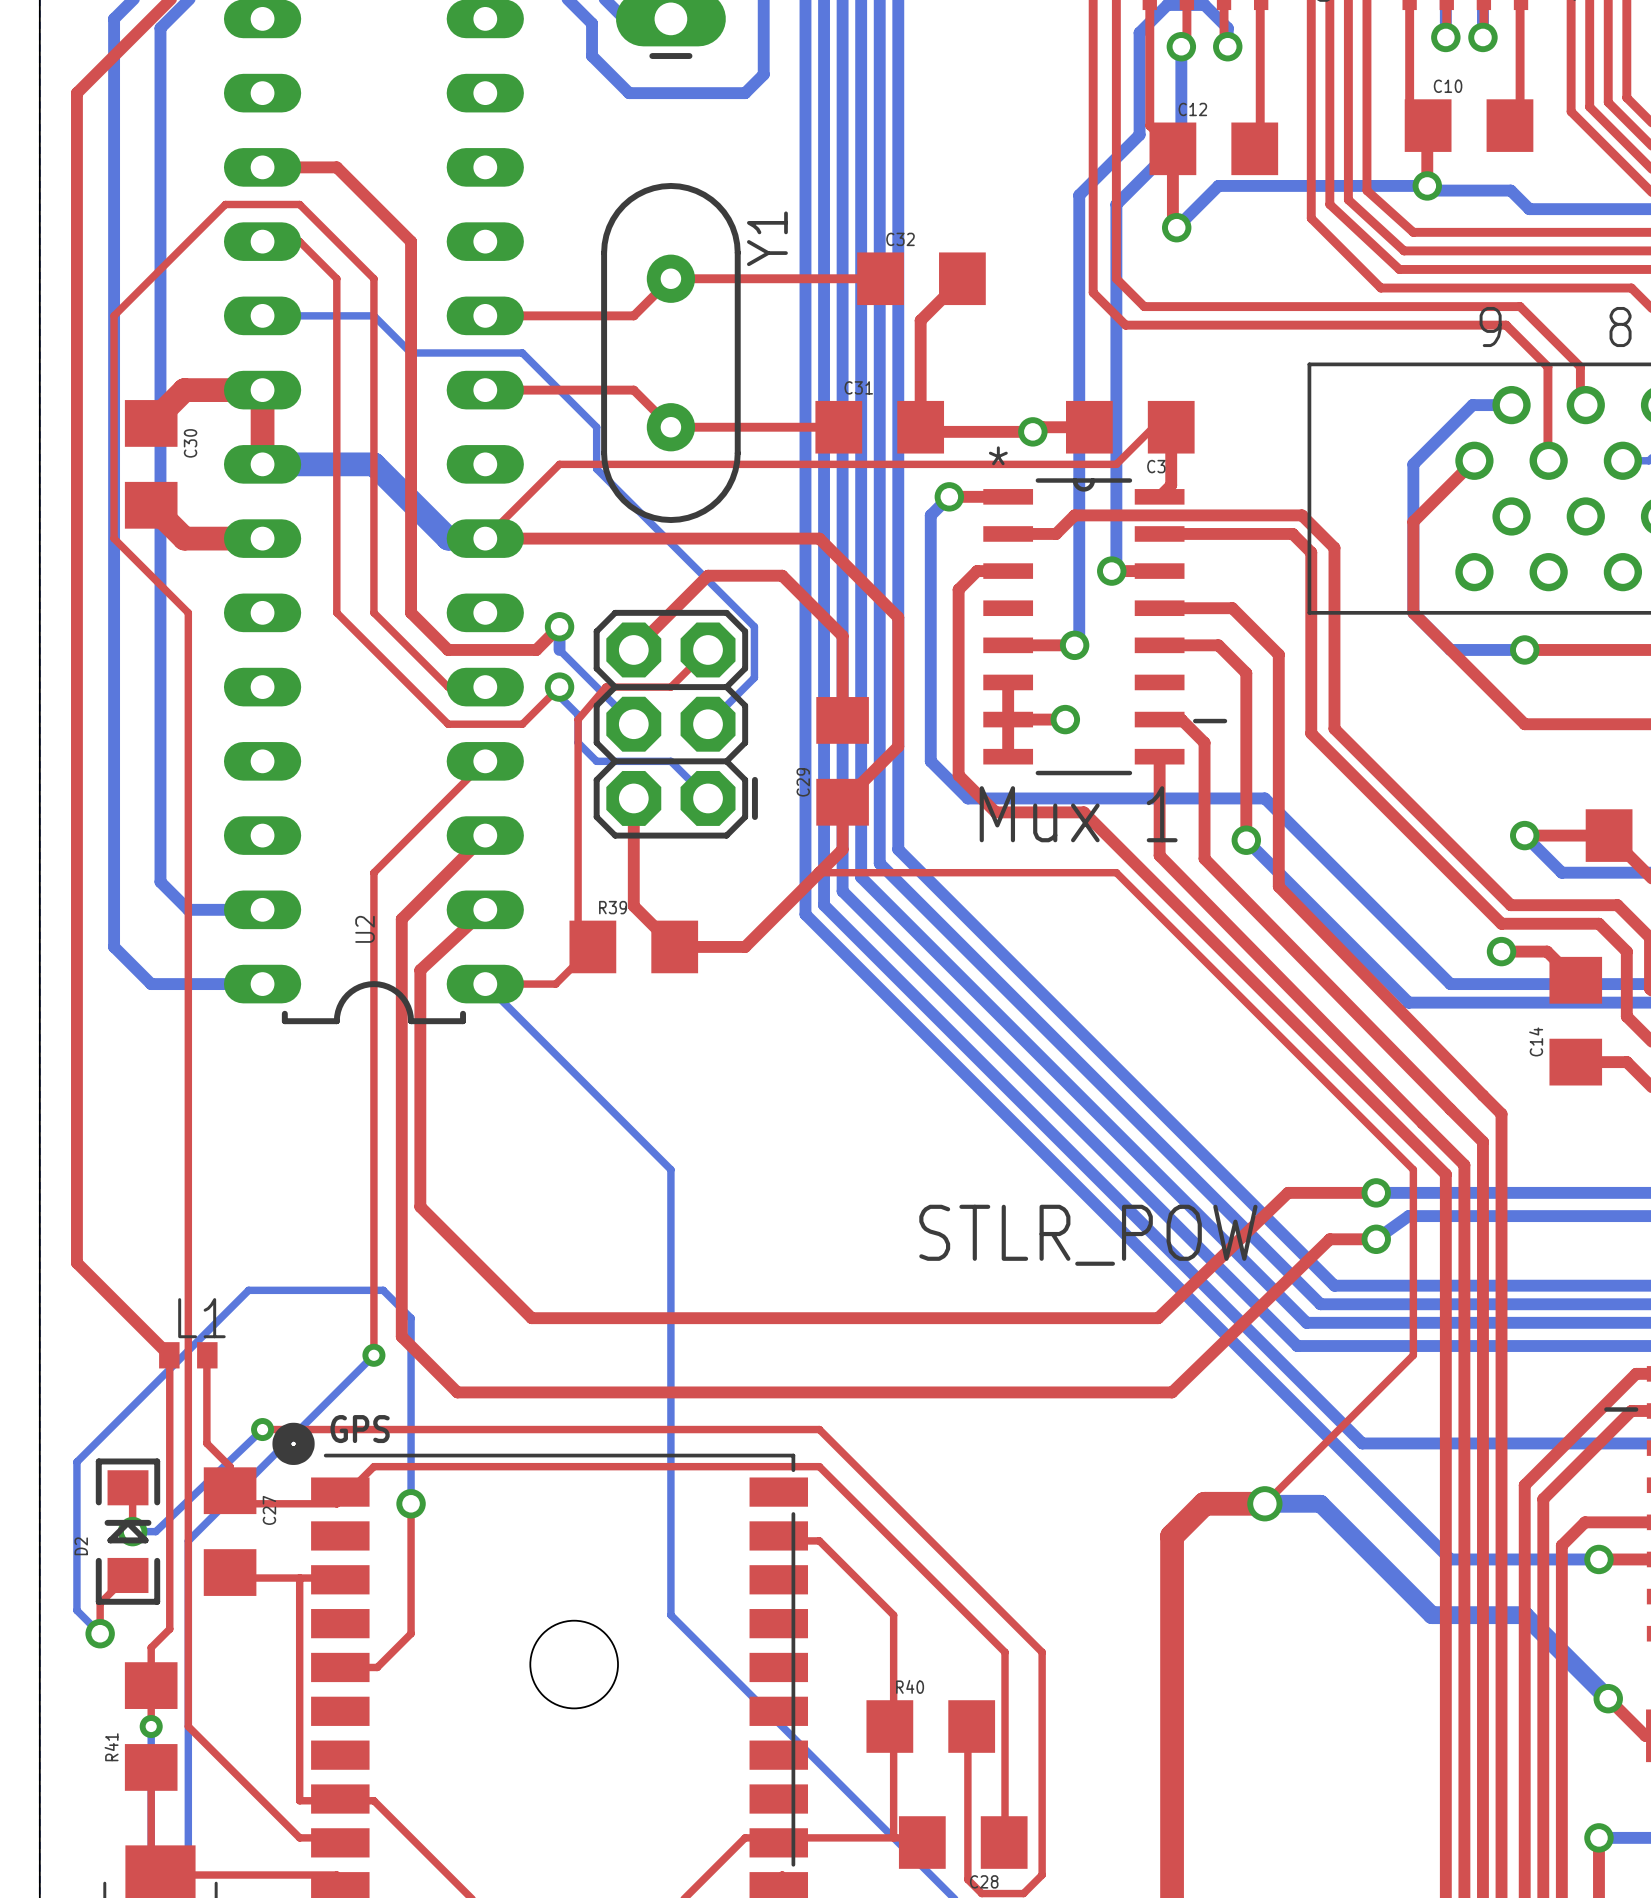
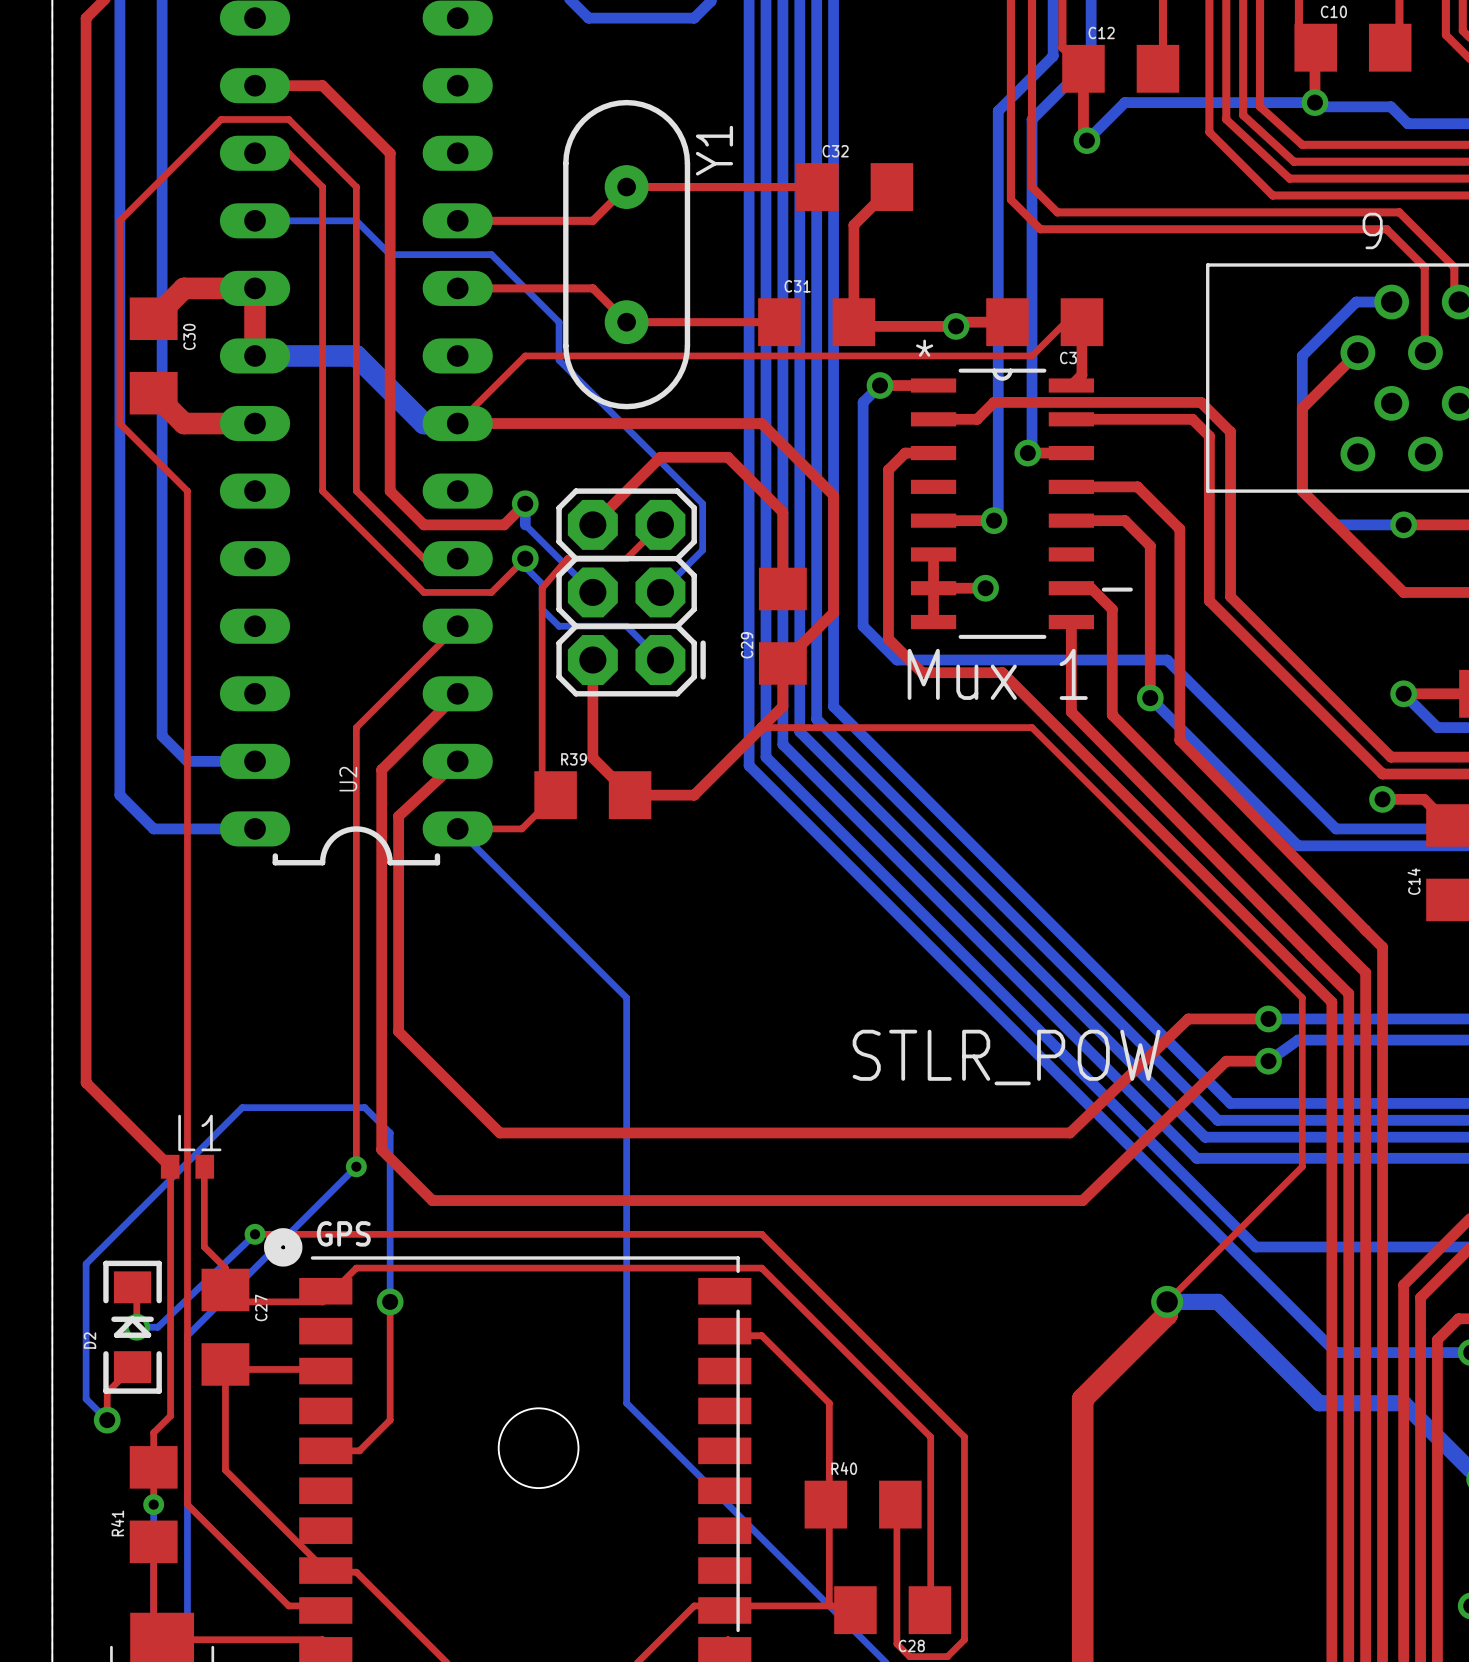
top track: (1264, 1503) (1204, 1503) (1172, 1536) (1172, 1610) -> (1167, 1301) (1167, 1314) (1082, 1399)
top track: none -> (225, 1364) (225, 1470) (325, 1570)
top track: (299, 1578) (299, 1800) (336, 1800) -> none

